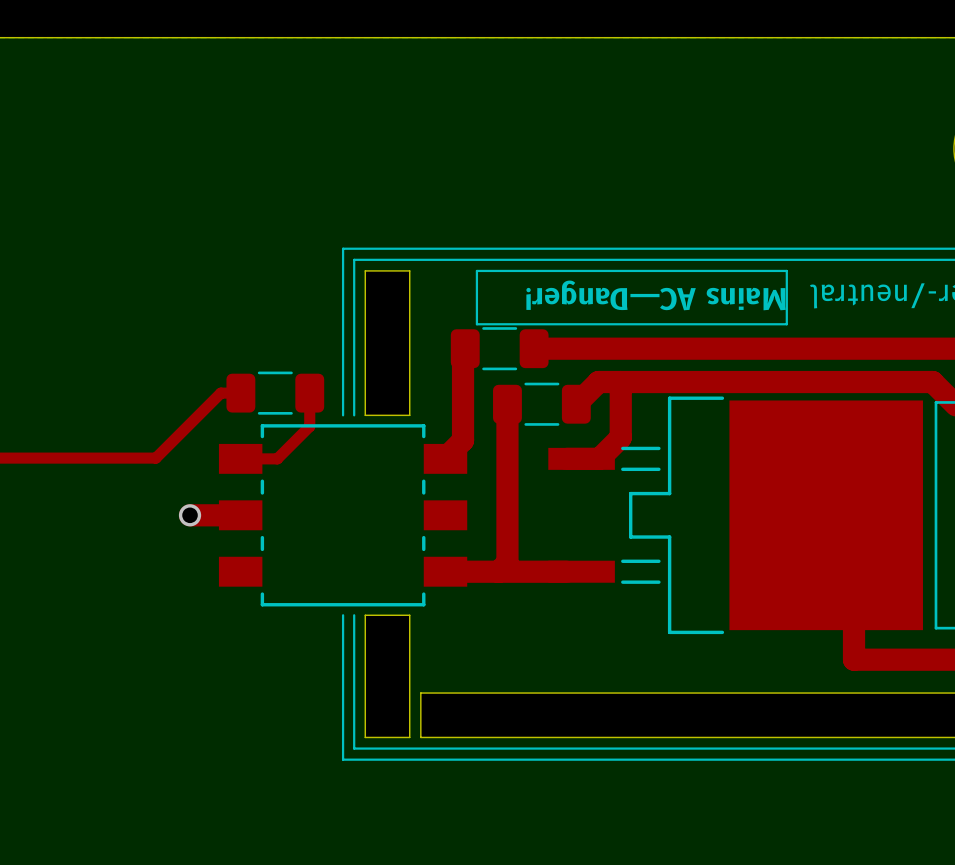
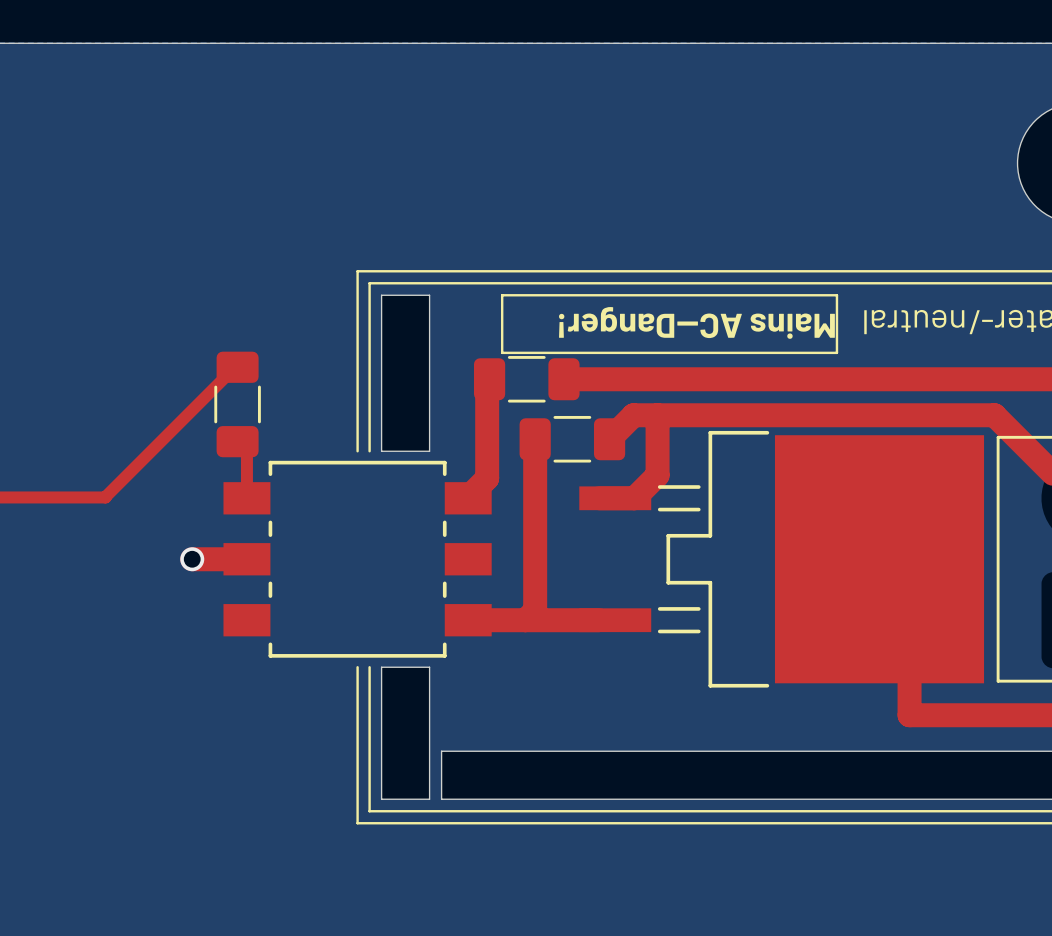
top track: (240, 393) (220, 393) (155, 458) (109, 458) -> (237, 364) (105, 497)
part rotation: 0° (275, 393) -> 90° clockwise (237, 404)
top track: (309, 393) (309, 426) (277, 458) (240, 458) -> (246, 448) (246, 497)

